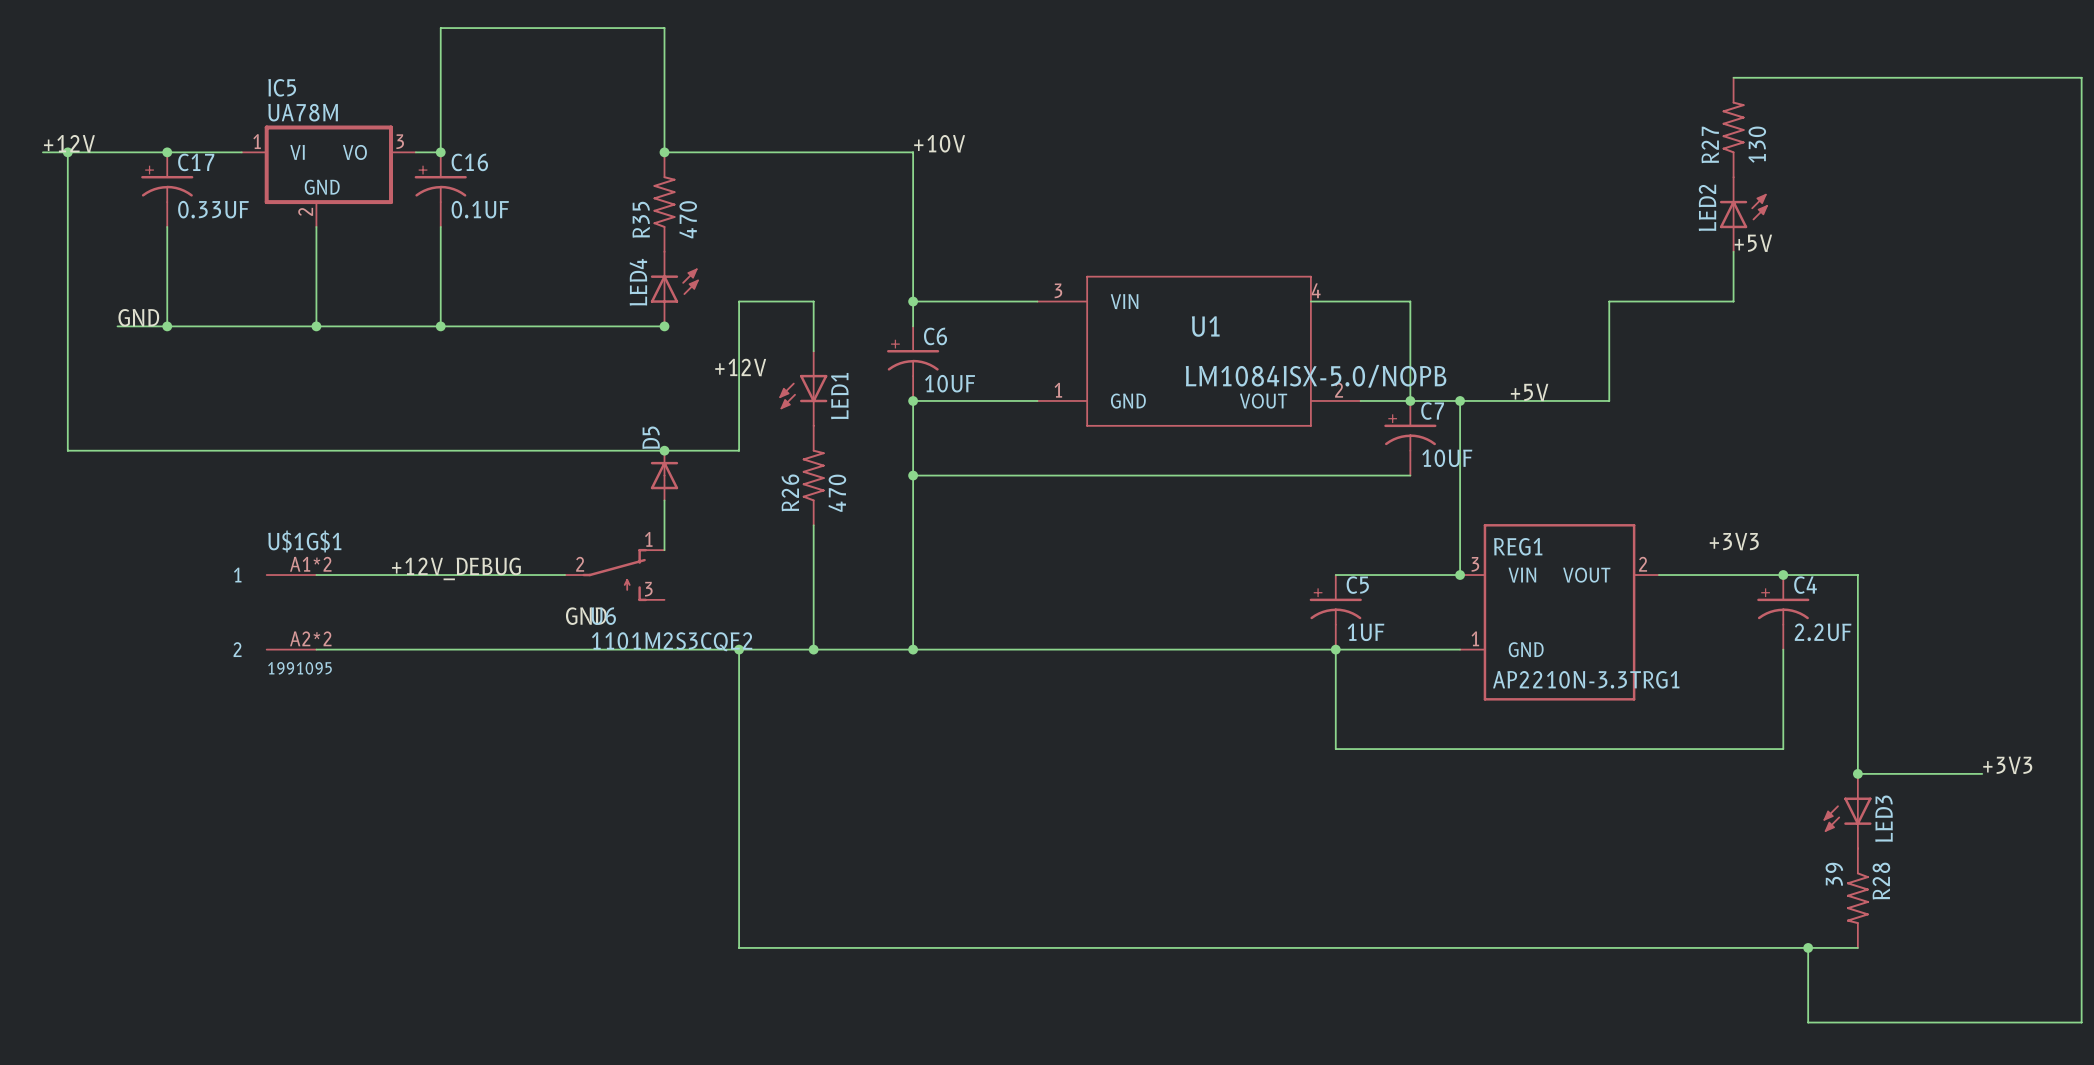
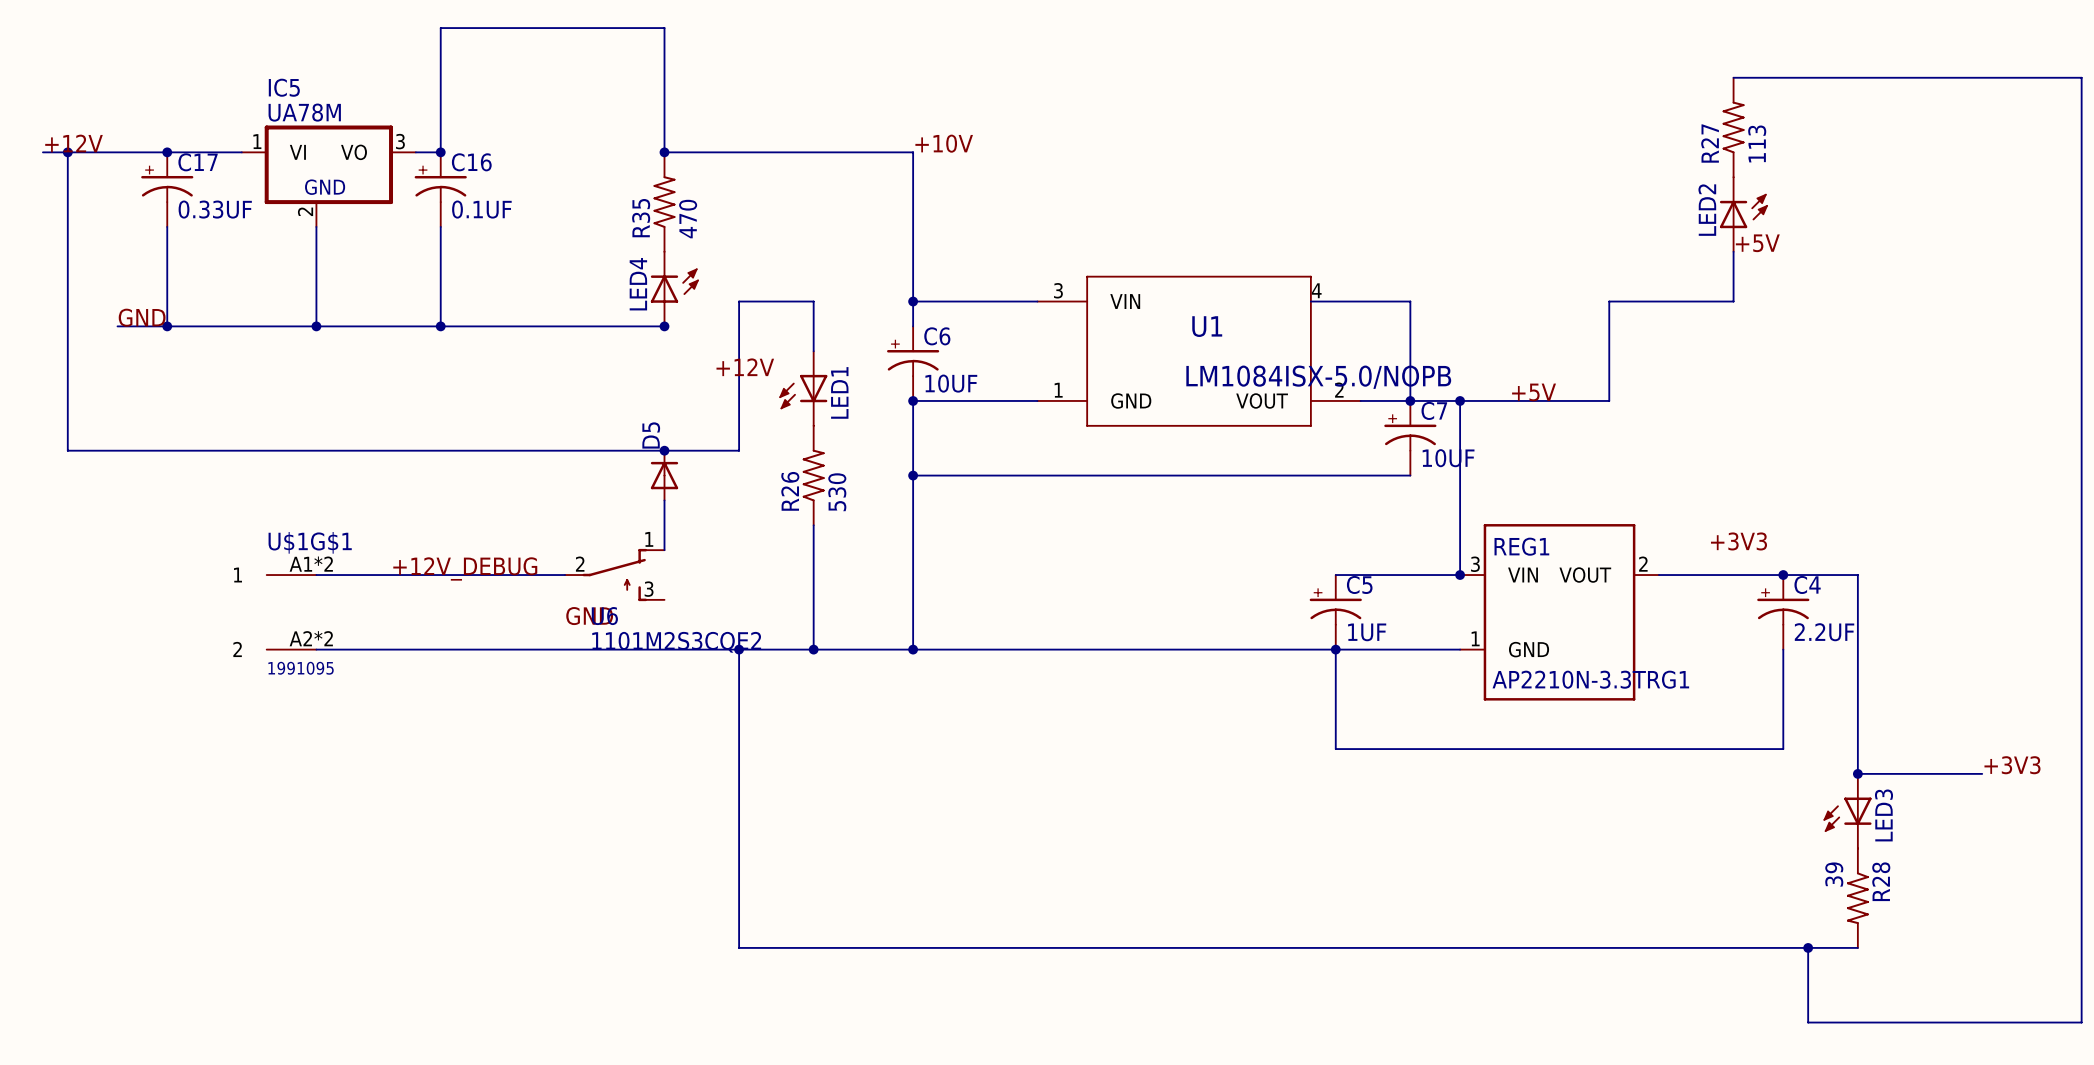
R27 value: 130 (1757, 144) -> 113 (1757, 143)
R26 value: 470 (837, 493) -> 530 (837, 492)

